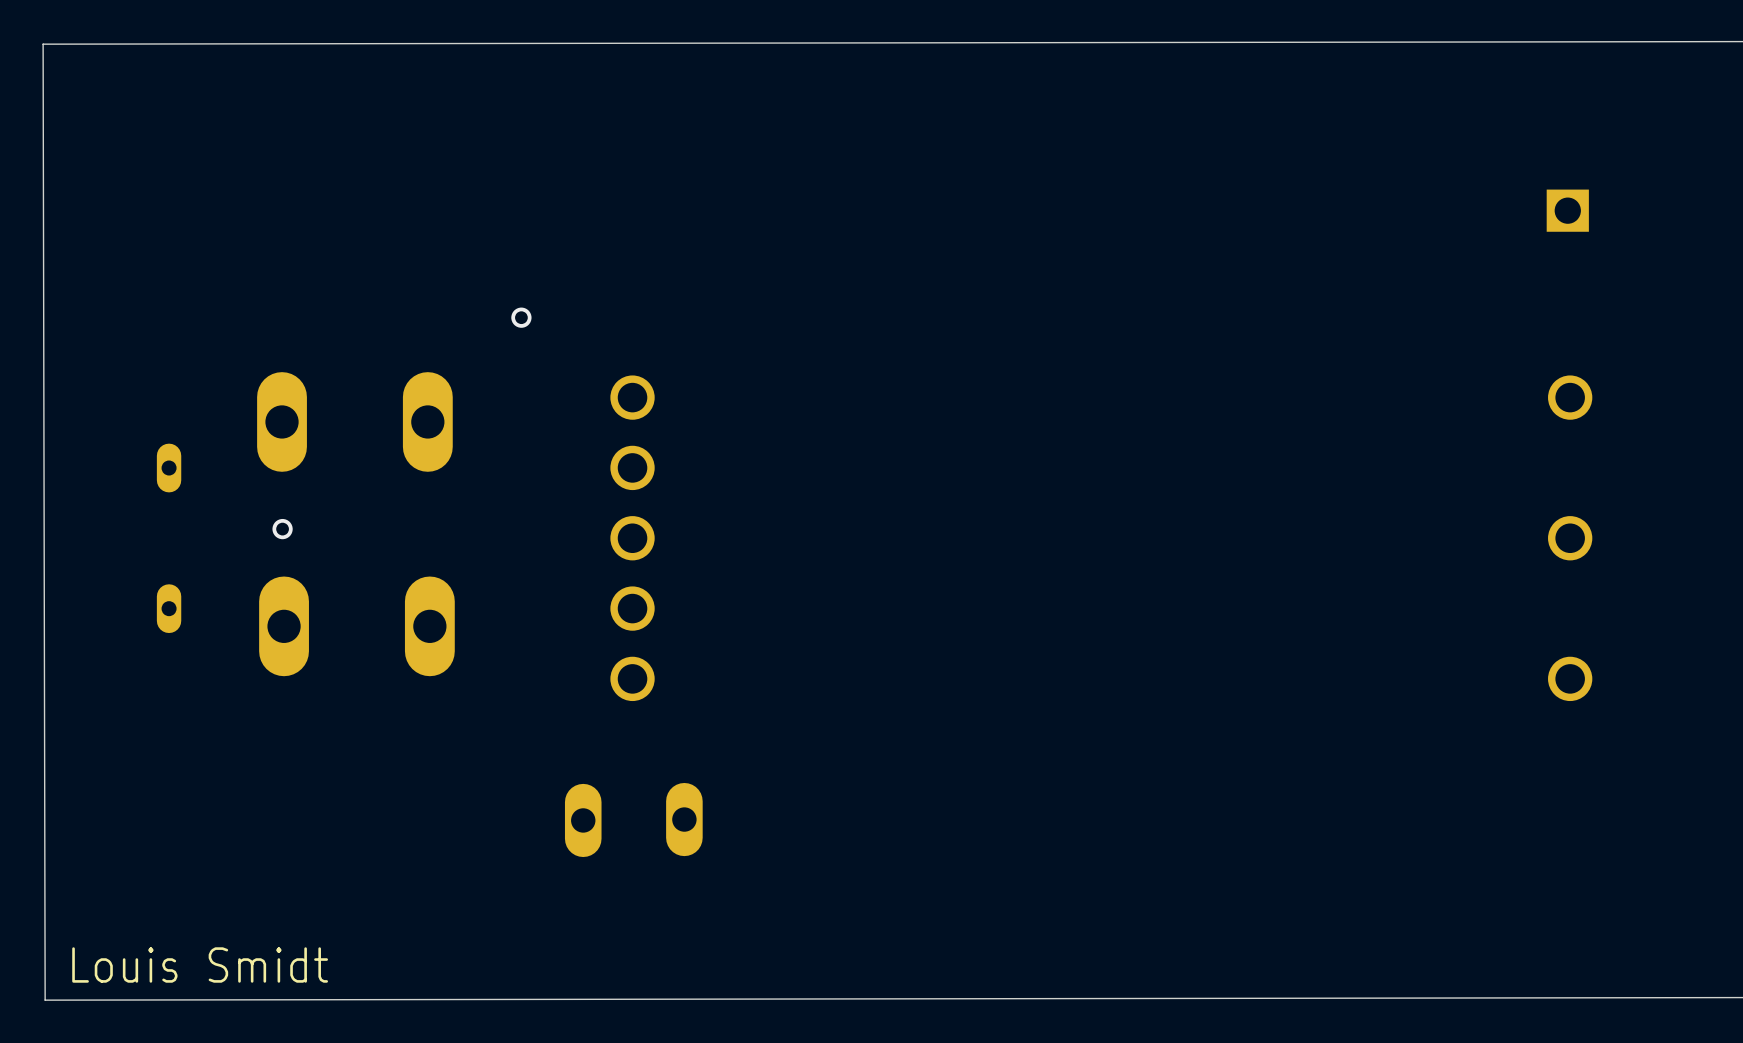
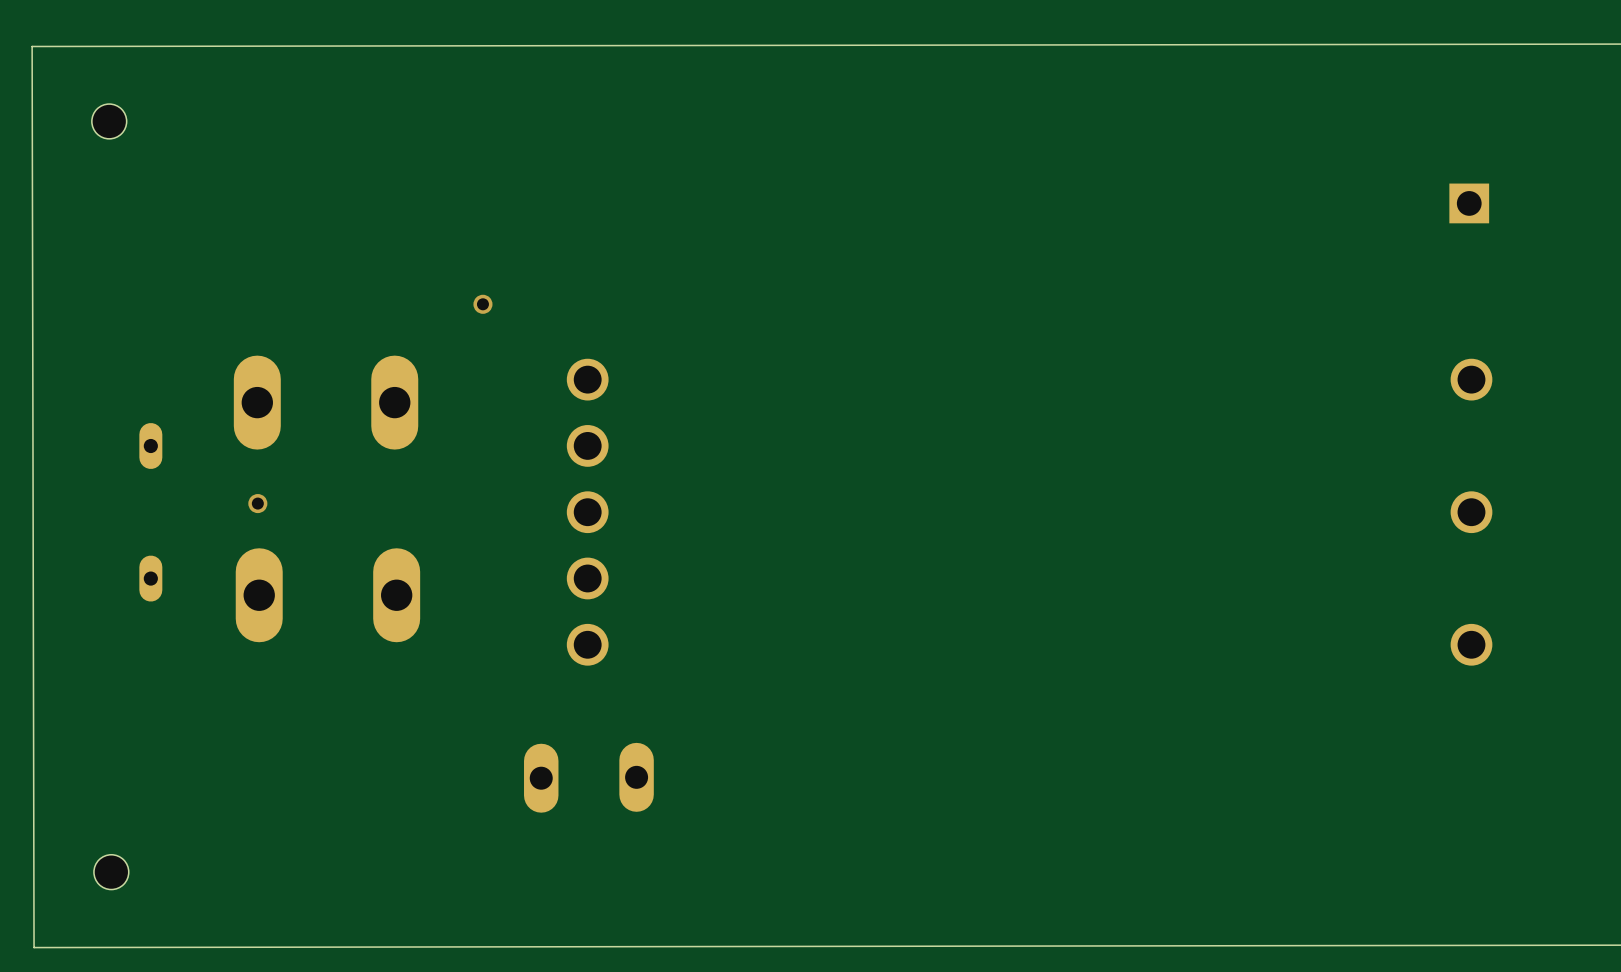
hole: none -> (109, 121)
hole: none -> (111, 872)
text: Louis Smidt (200, 965) -> none

